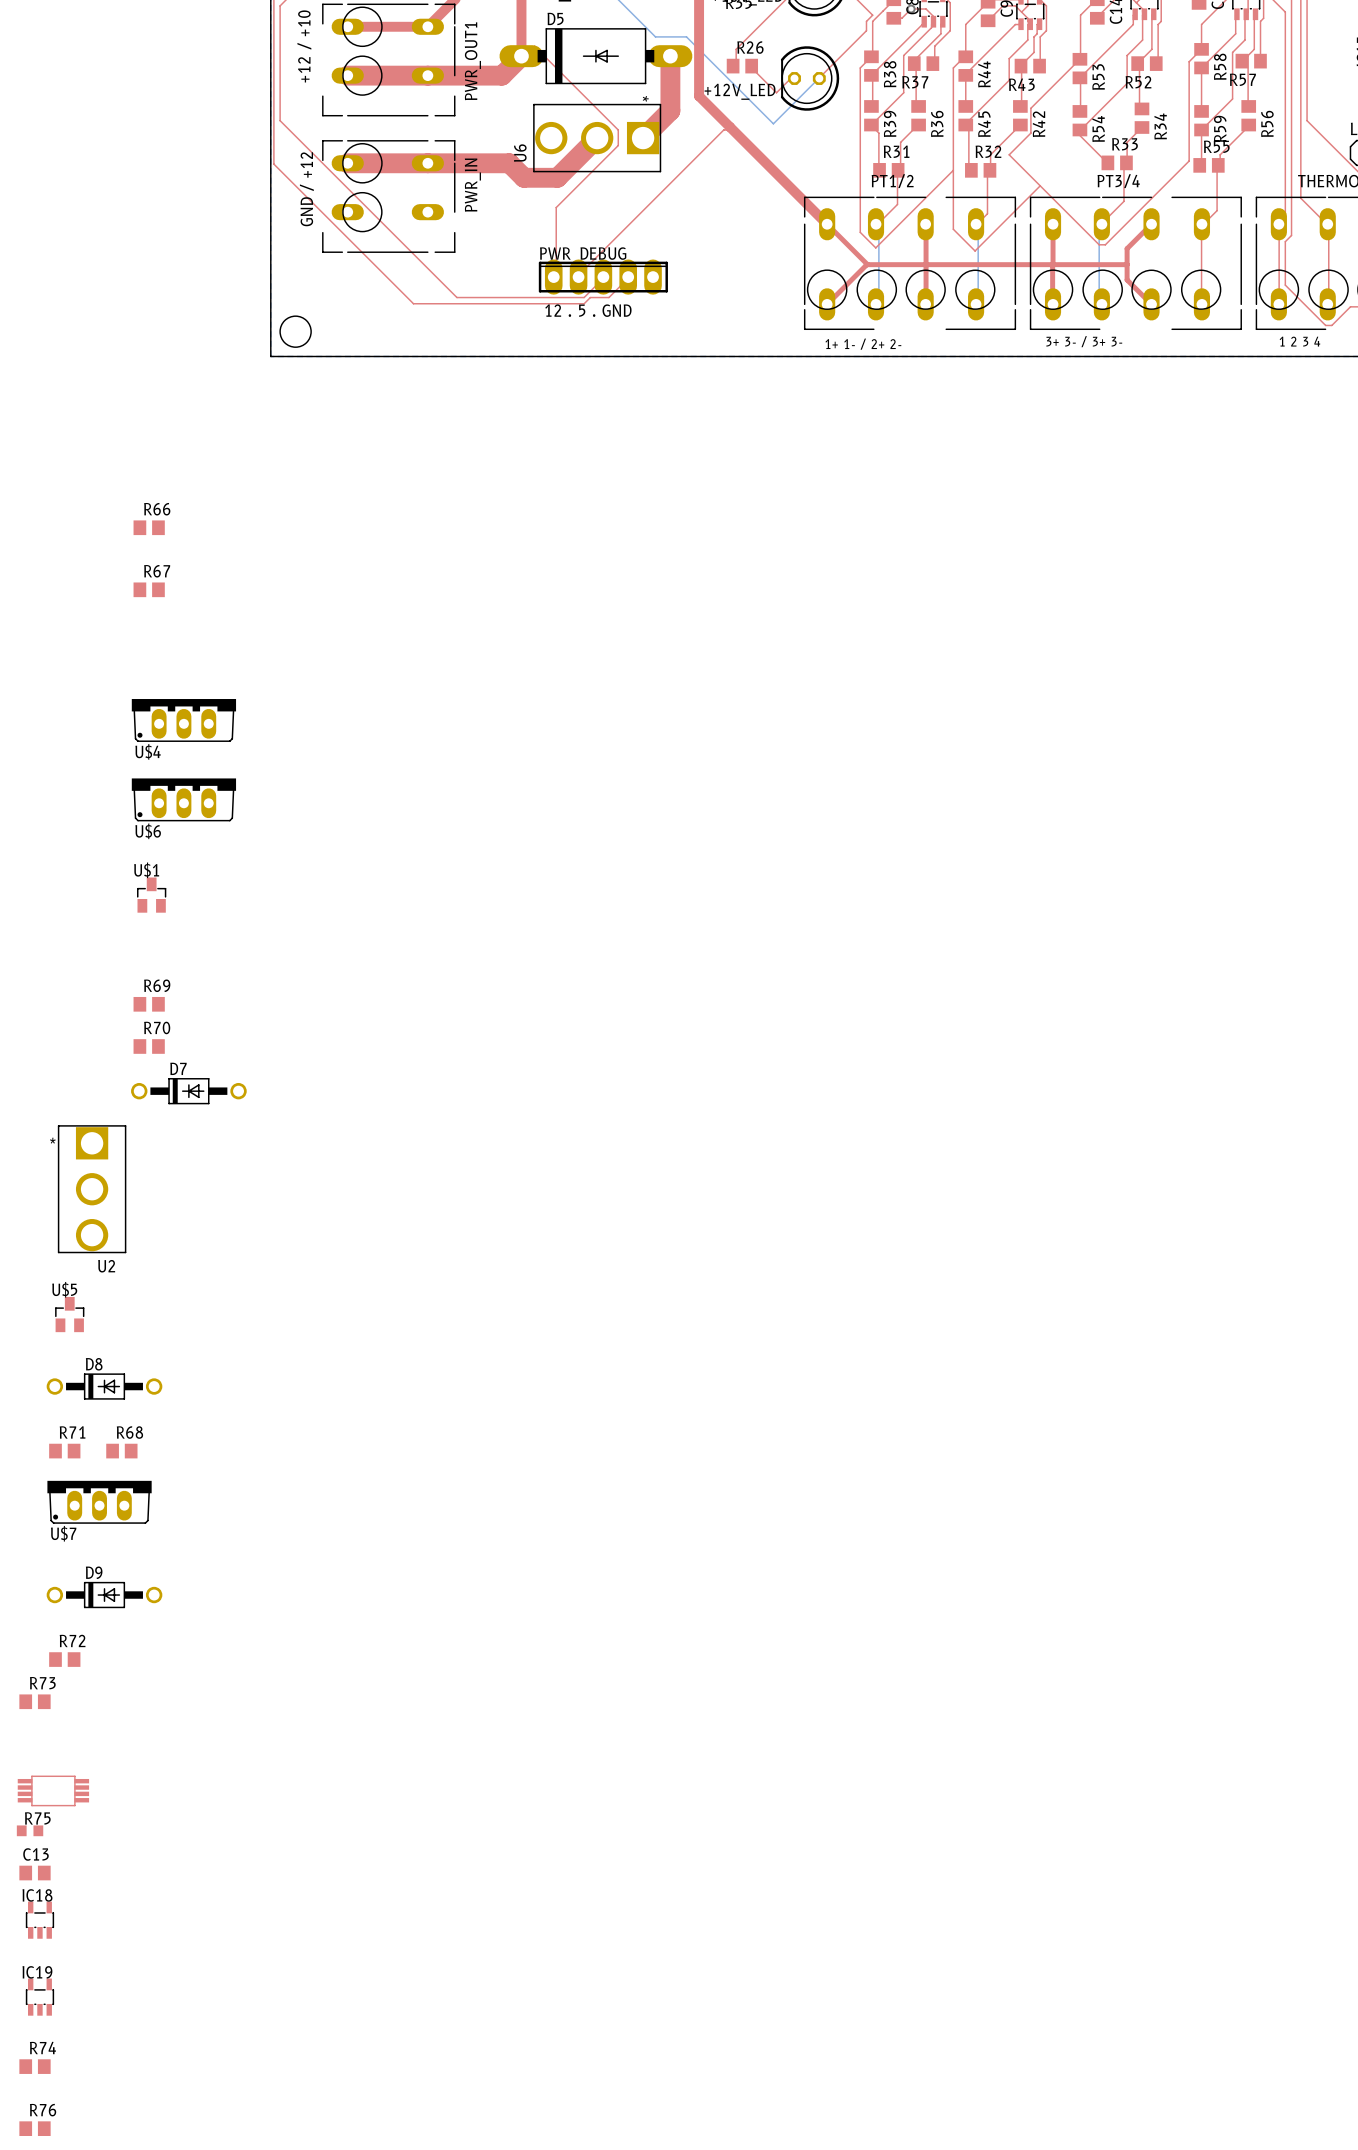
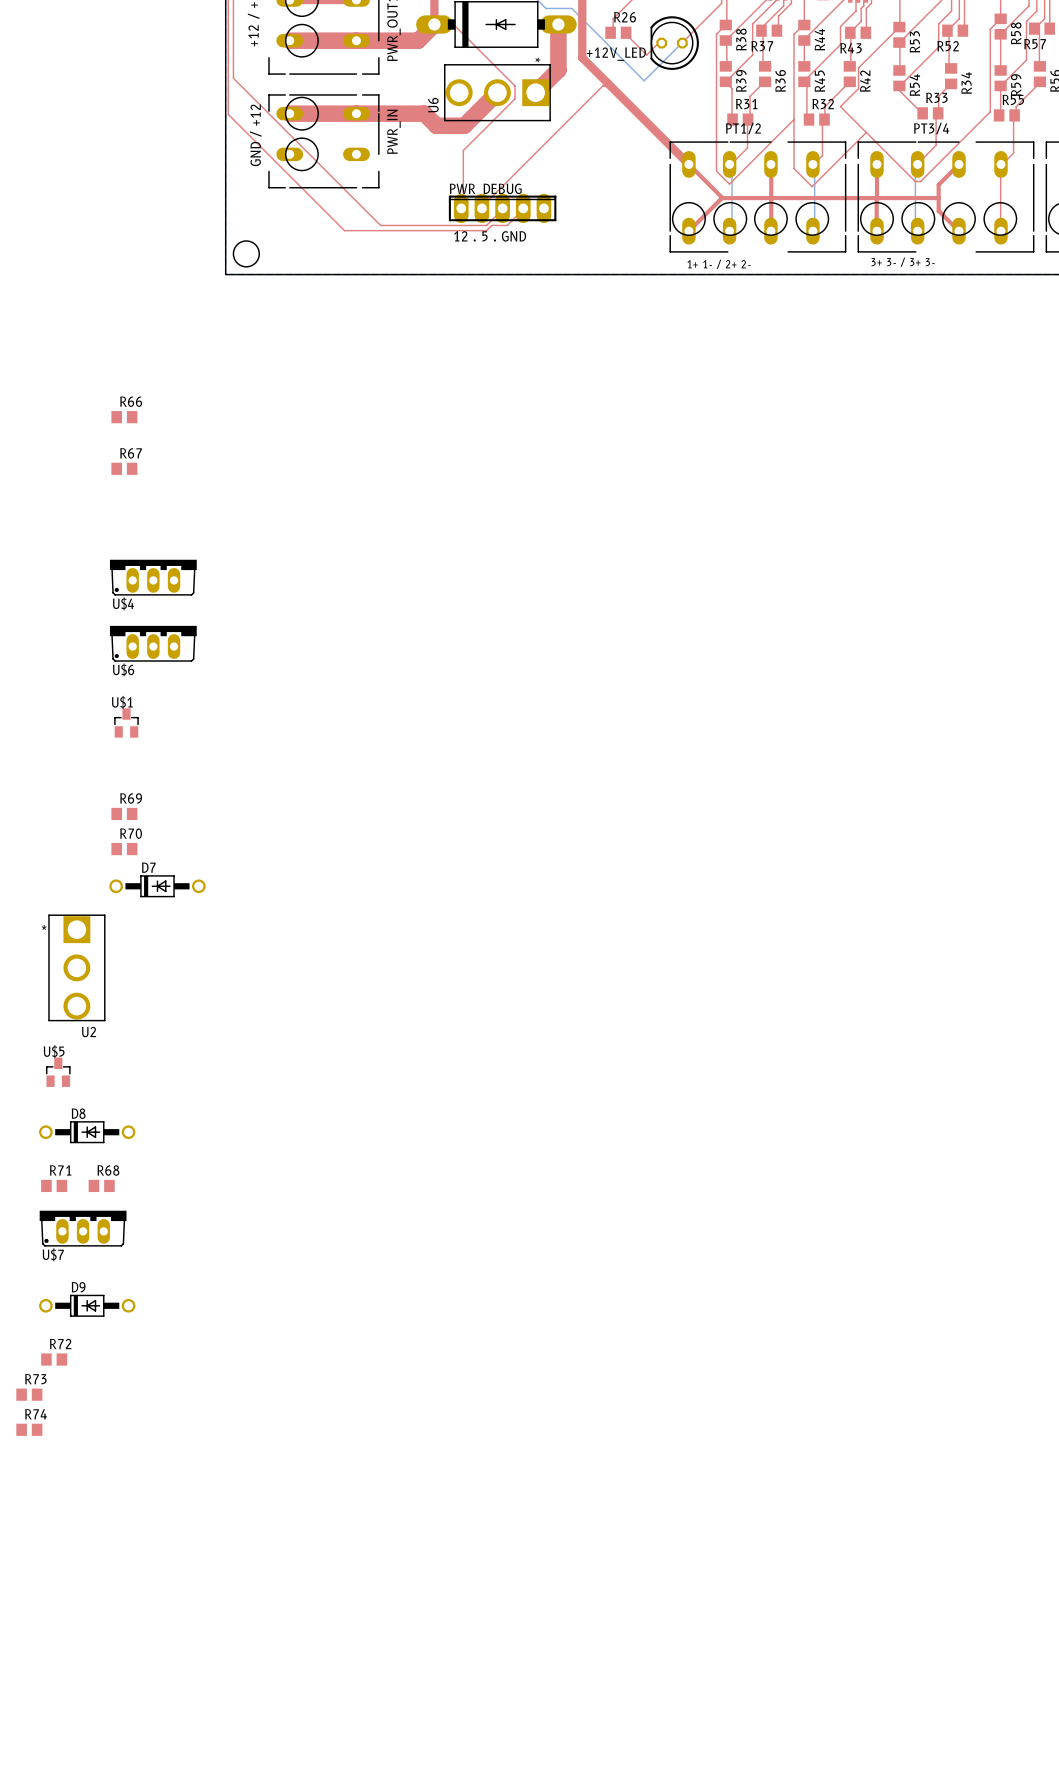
part: (53, 1790) -> none
R75: (30, 1830) -> none
C13: (35, 1873) -> none
IC18: (39, 1920) -> none
IC19: (39, 1997) -> none
R74 position: (35, 2066) -> (29, 1429)
R76: (35, 2128) -> none

